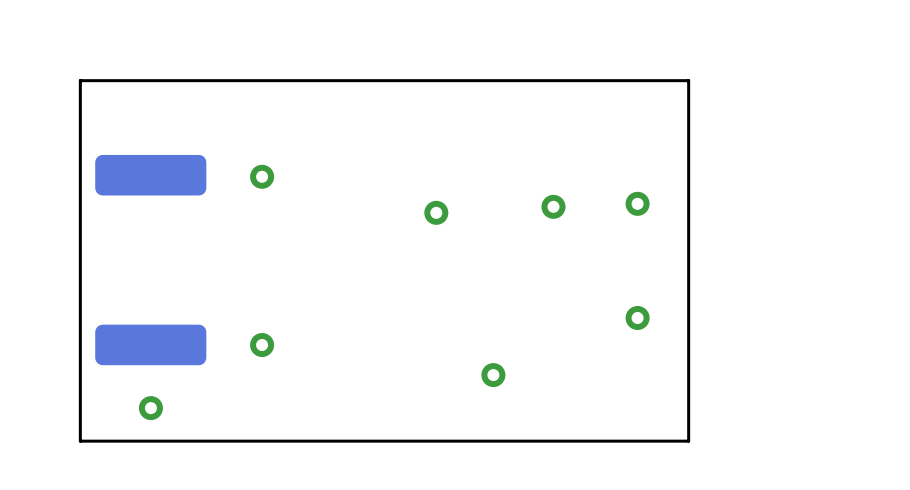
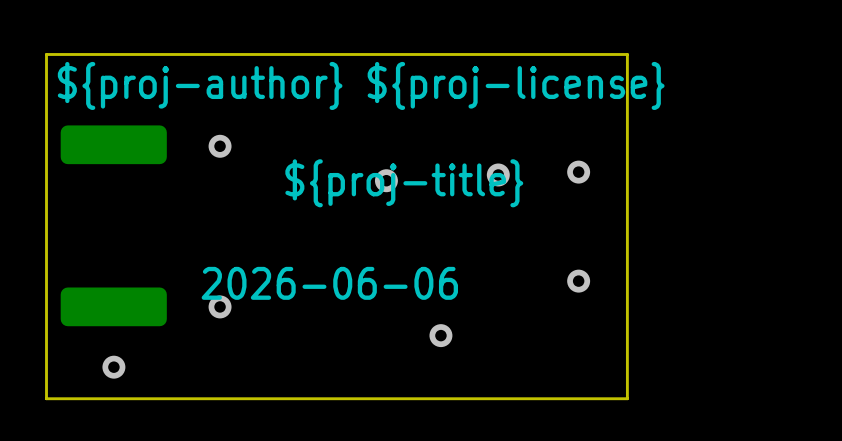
text: none -> ${proj-author} ${proj-license} (361, 85)
text: none -> ${proj-title} (404, 183)
text: none -> 2026-06-06 (329, 283)

